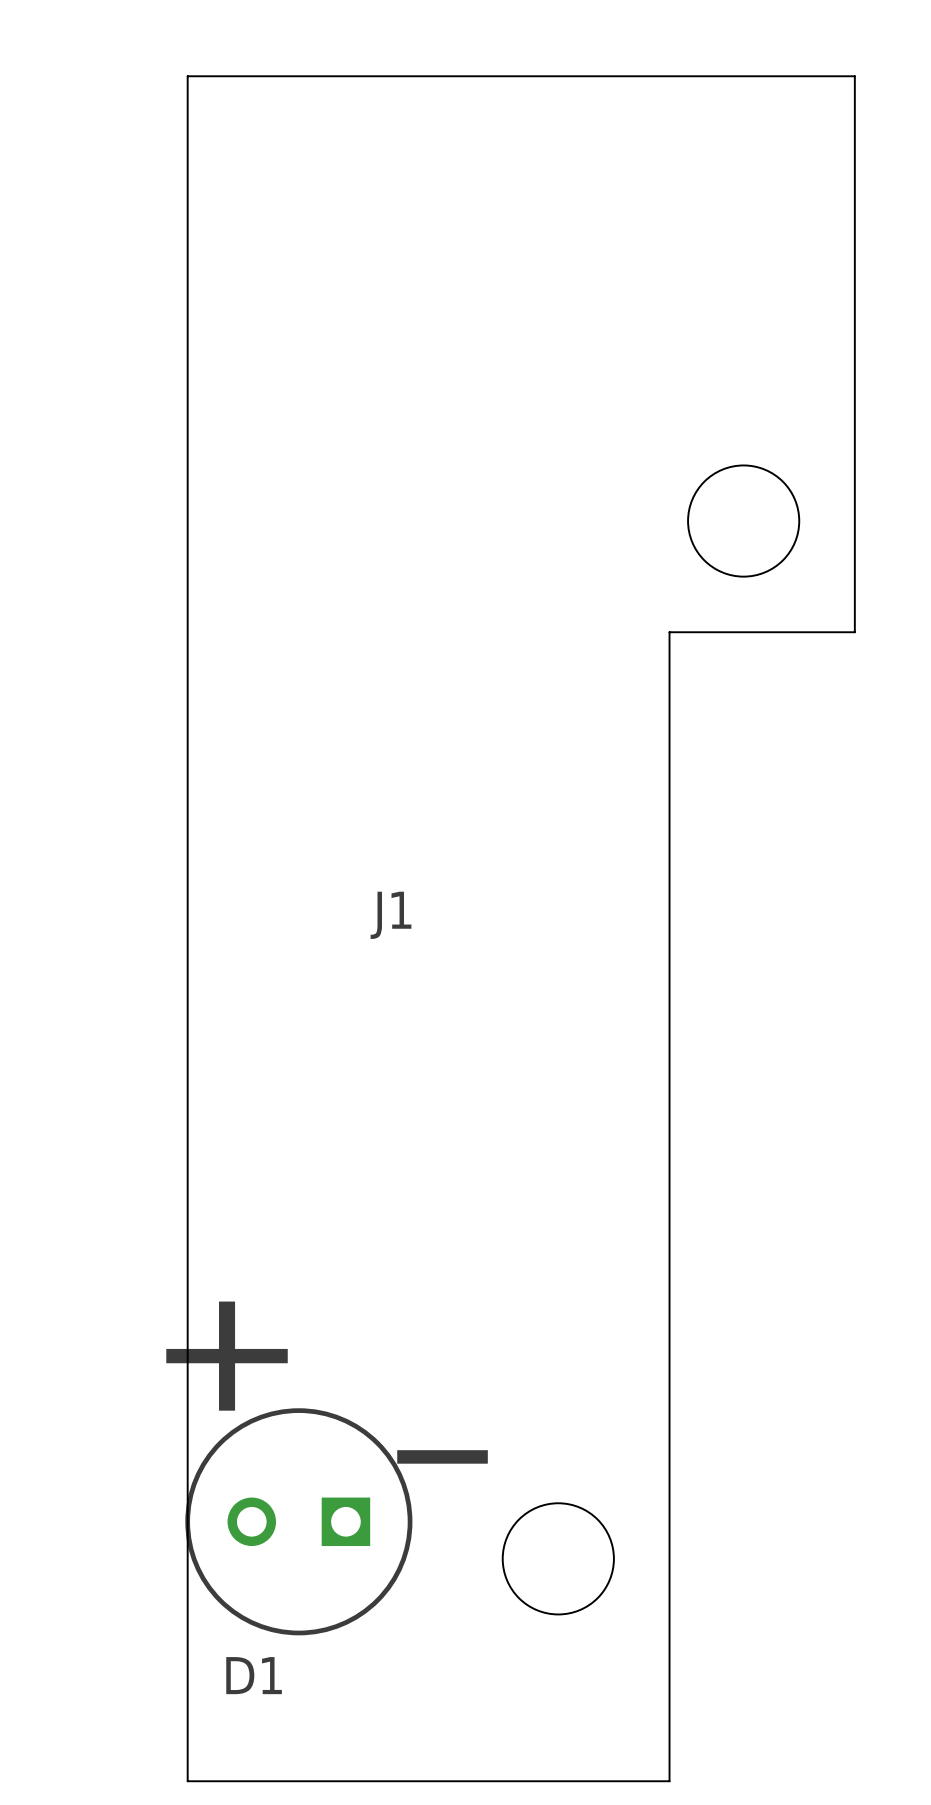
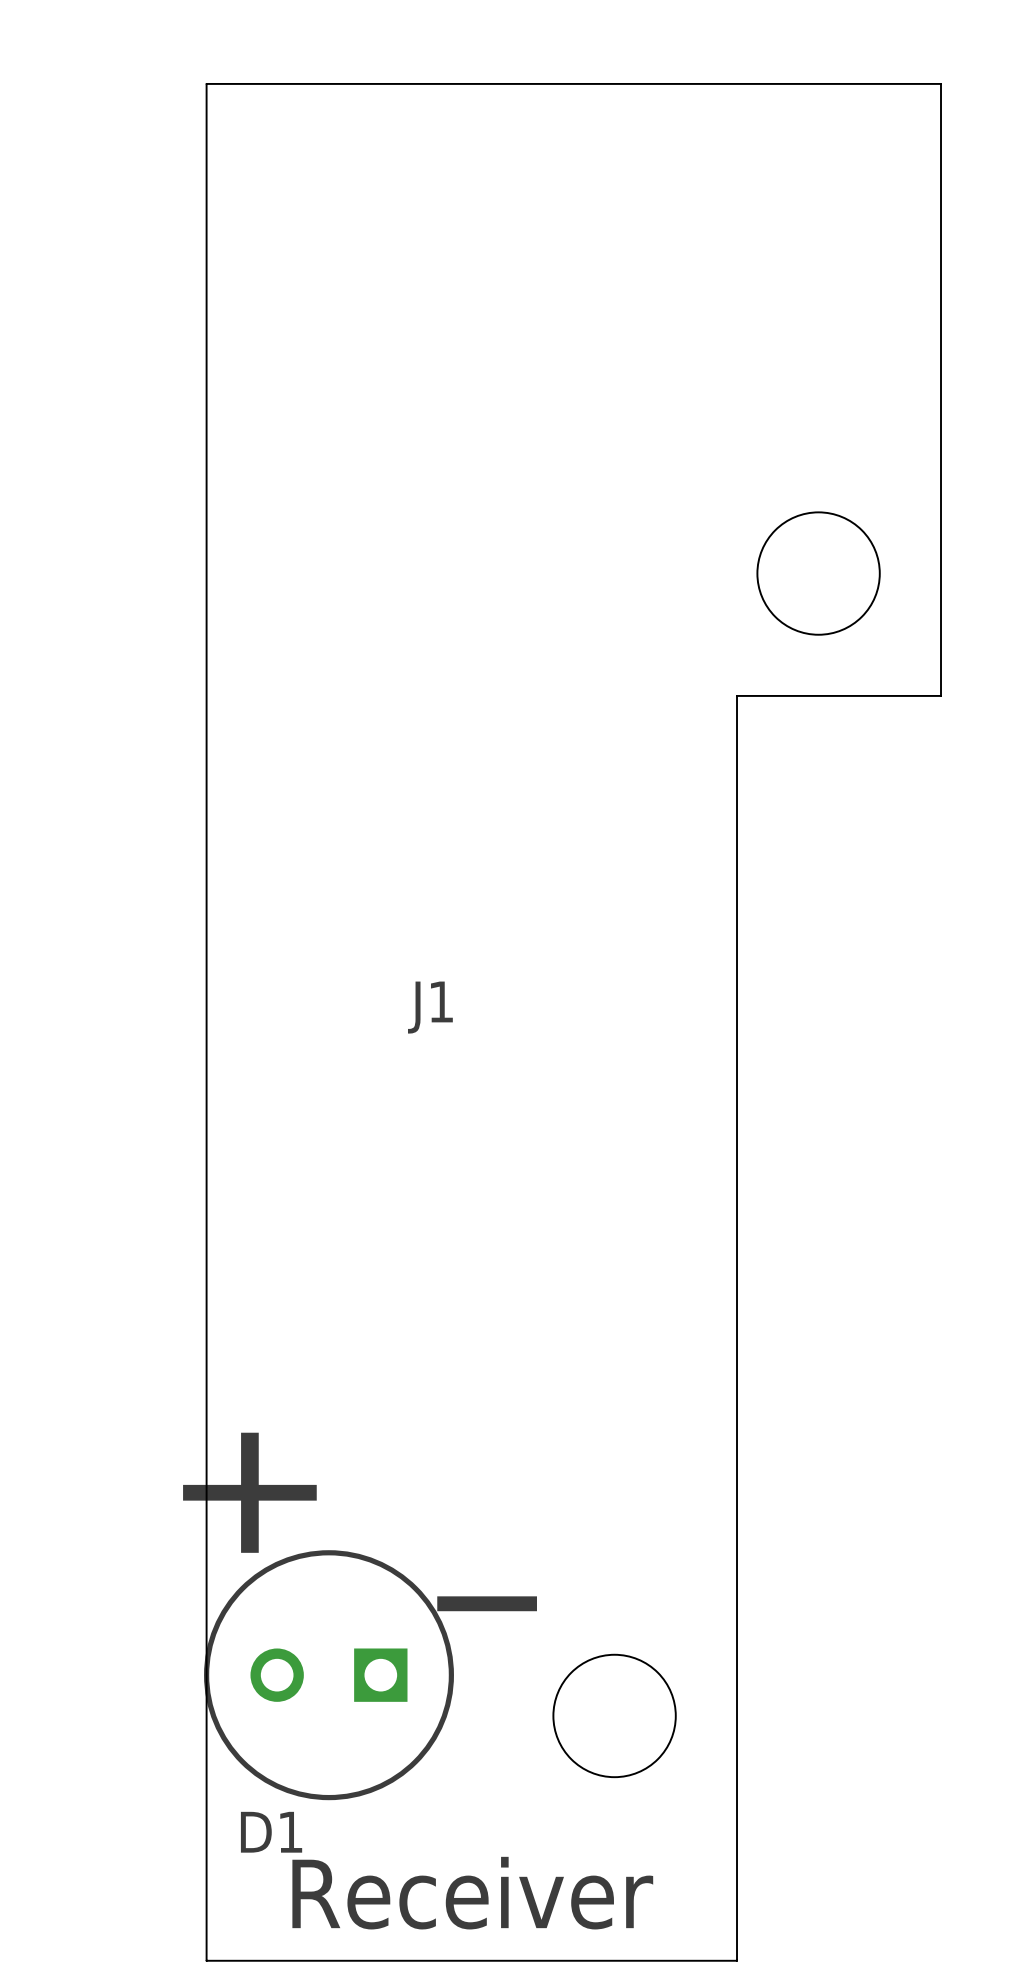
D1 name position: D1 (254, 1675) -> D1 (271, 1832)
text: none -> Receiver (472, 1893)

